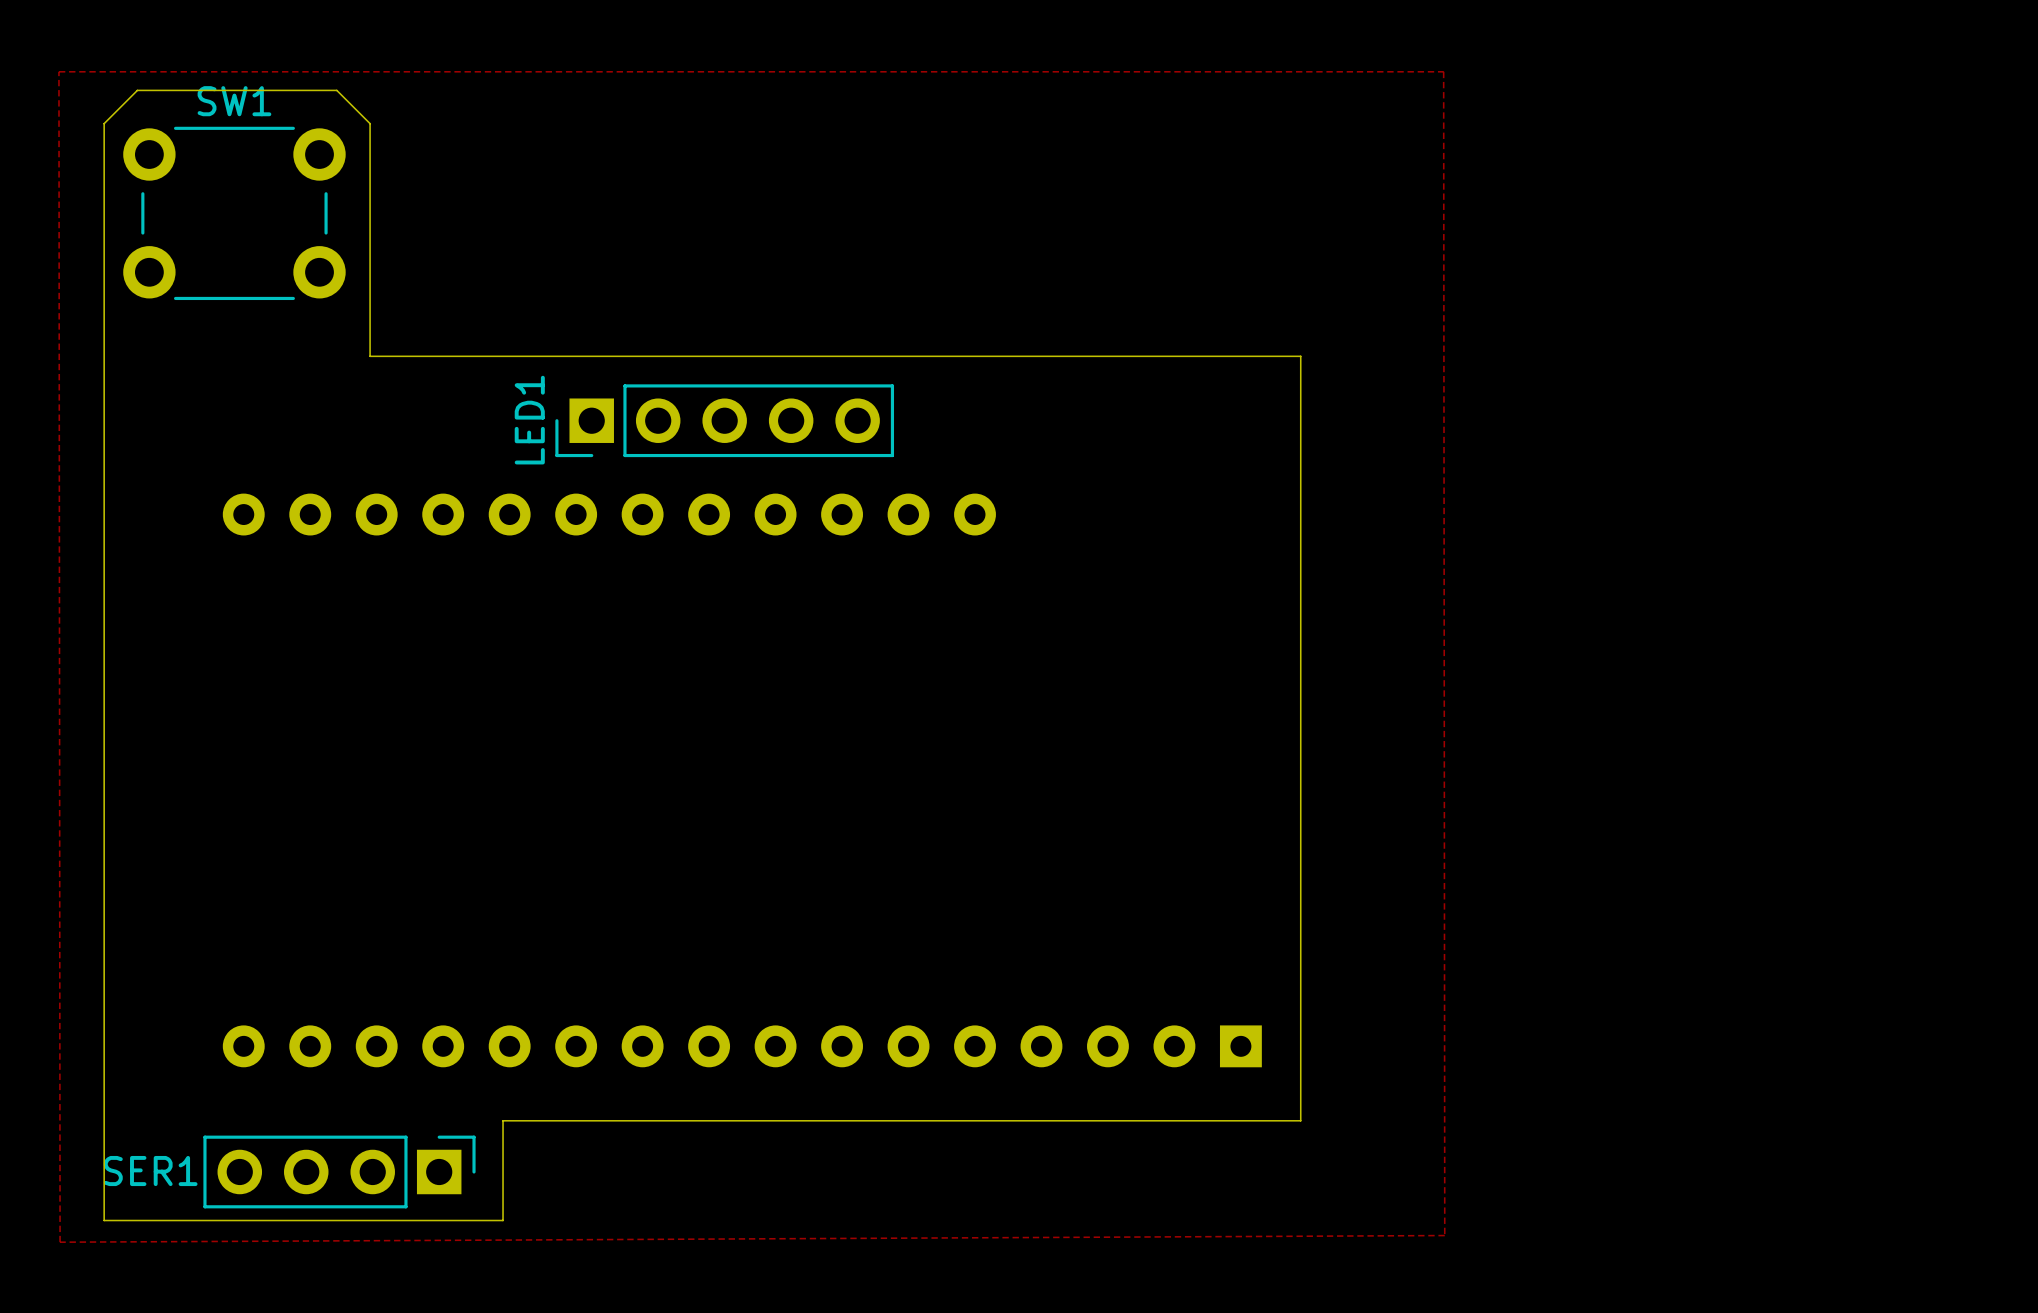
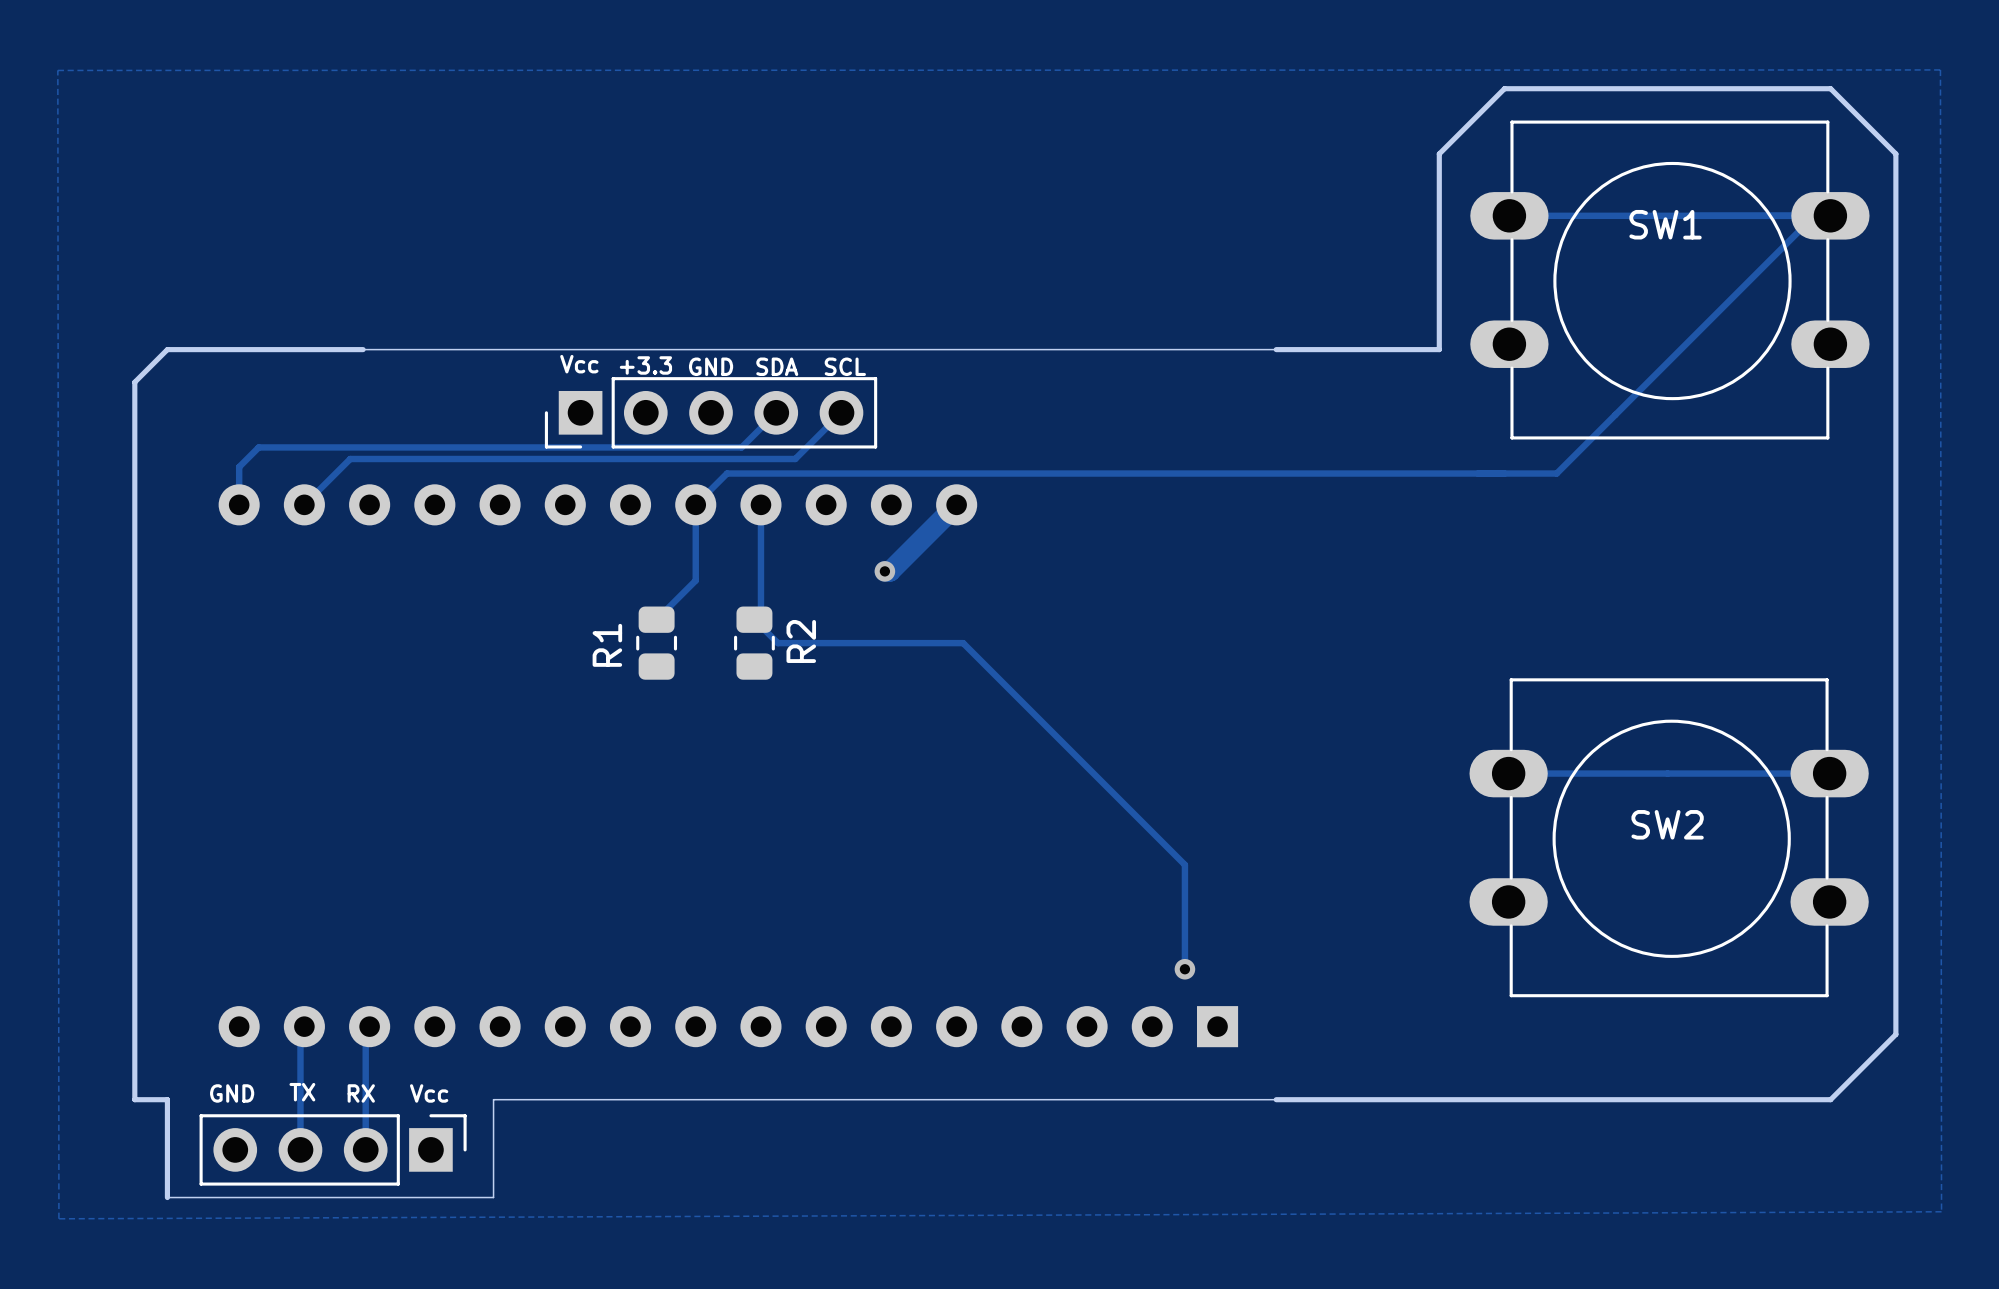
zone outline: (58, 71) (1443, 71) (1444, 1235) (60, 1242) -> (57, 70) (1940, 69) (1941, 1211) (58, 1218)
SW1 name position: SW1 (234, 101) -> SW1 (1665, 224)
SW1 footprint: [123, 126, 346, 301] -> [1470, 120, 1870, 440]
track: none -> (1509, 215) (1830, 215)
track: none -> (1814, 215) (1556, 473) (727, 473) (695, 504) (695, 580) (656, 619)
board edge: (370, 356) (370, 123) (336, 90) (137, 90) (104, 123) (104, 1220) (170, 1220) -> (363, 349) (167, 349) (134, 382) (134, 1099) (167, 1099) (167, 1197)
board edge: (1300, 356) (1300, 1120) -> (1276, 349) (1439, 349) (1439, 153) (1504, 88) (1830, 88) (1895, 153) (1895, 1034) (1830, 1099) (1276, 1099)
text: none -> Vcc (579, 364)
text: none -> +3.3 (645, 365)
text: none -> GND (711, 366)
text: none -> SDA (777, 366)
text: none -> SCL (845, 366)
LED1 name: LED1 (529, 420) -> none
track: none -> (776, 412) (741, 447) (258, 447) (239, 467) (239, 504)
track: none -> (841, 412) (795, 459) (350, 459) (304, 504)
track: none -> (760, 504) (760, 613) (754, 619) (777, 643) (963, 643) (1184, 864) (1184, 969)
track: none -> (956, 504) (890, 571) (884, 571)
via: none -> (884, 571)
R1: none -> (656, 643)
R2: none -> (754, 643)
track: none -> (1508, 773) (1829, 773)
SW2: none -> (1669, 837)
via: none -> (1184, 969)
track: none -> (304, 1026) (300, 1030) (300, 1149)
track: none -> (369, 1026) (365, 1030) (365, 1149)
text: none -> TX (302, 1092)
text: none -> GND (232, 1093)
text: none -> RX (361, 1093)
text: none -> Vcc (429, 1093)
SER1 name: SER1 (150, 1171) -> none

